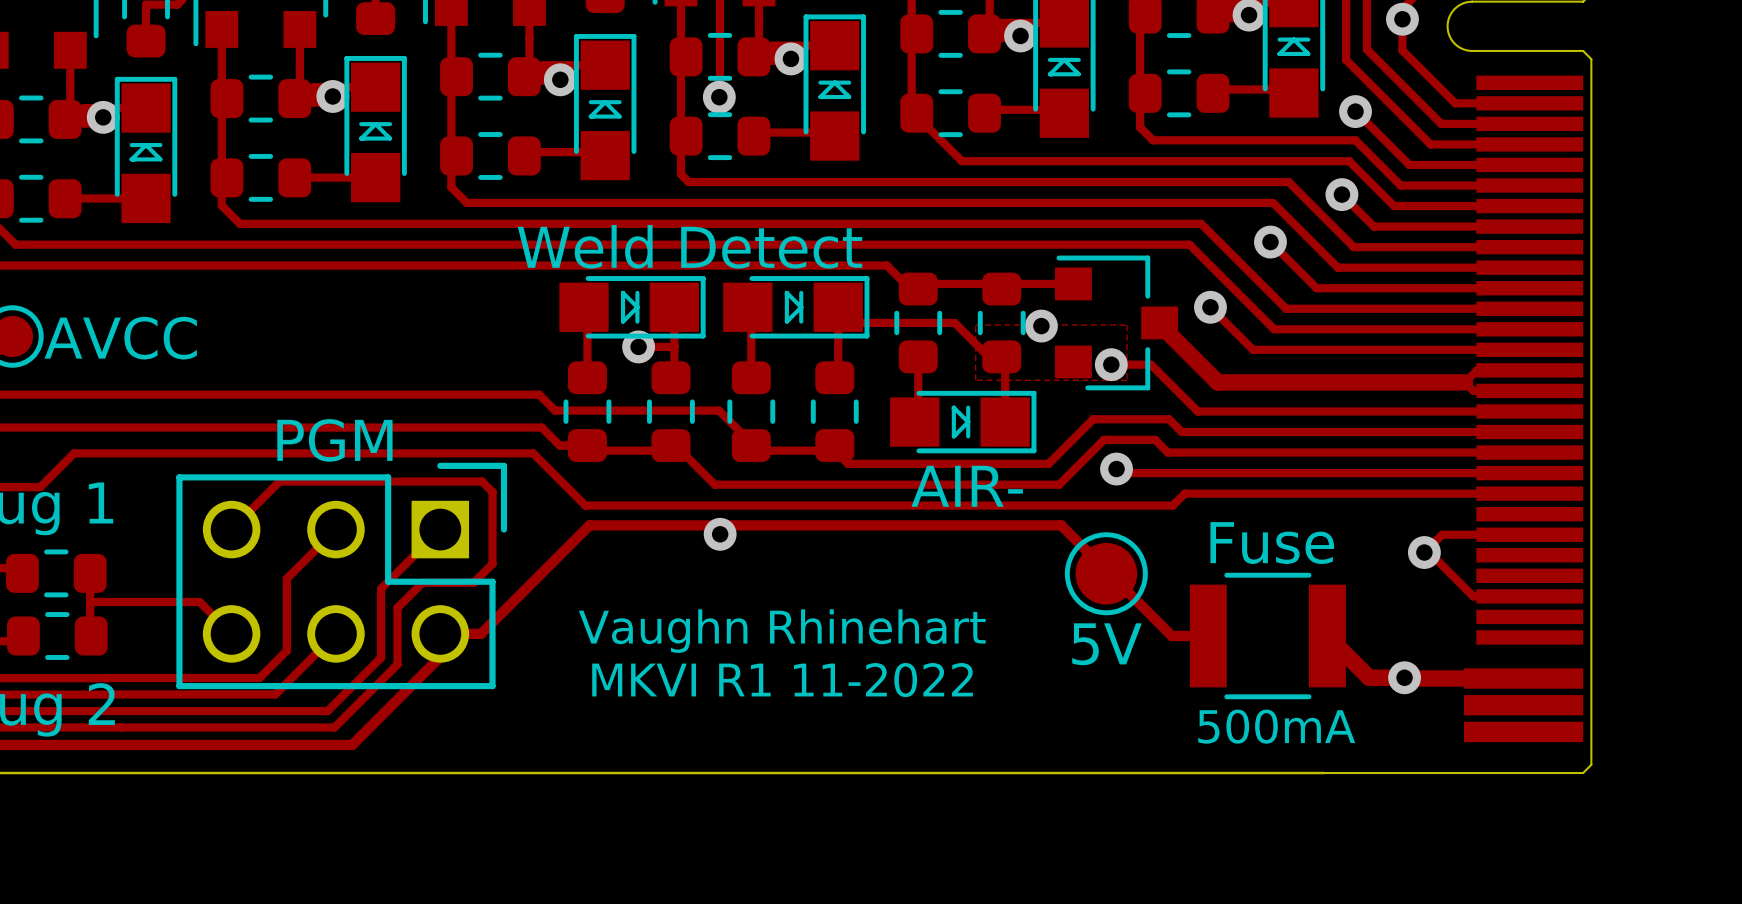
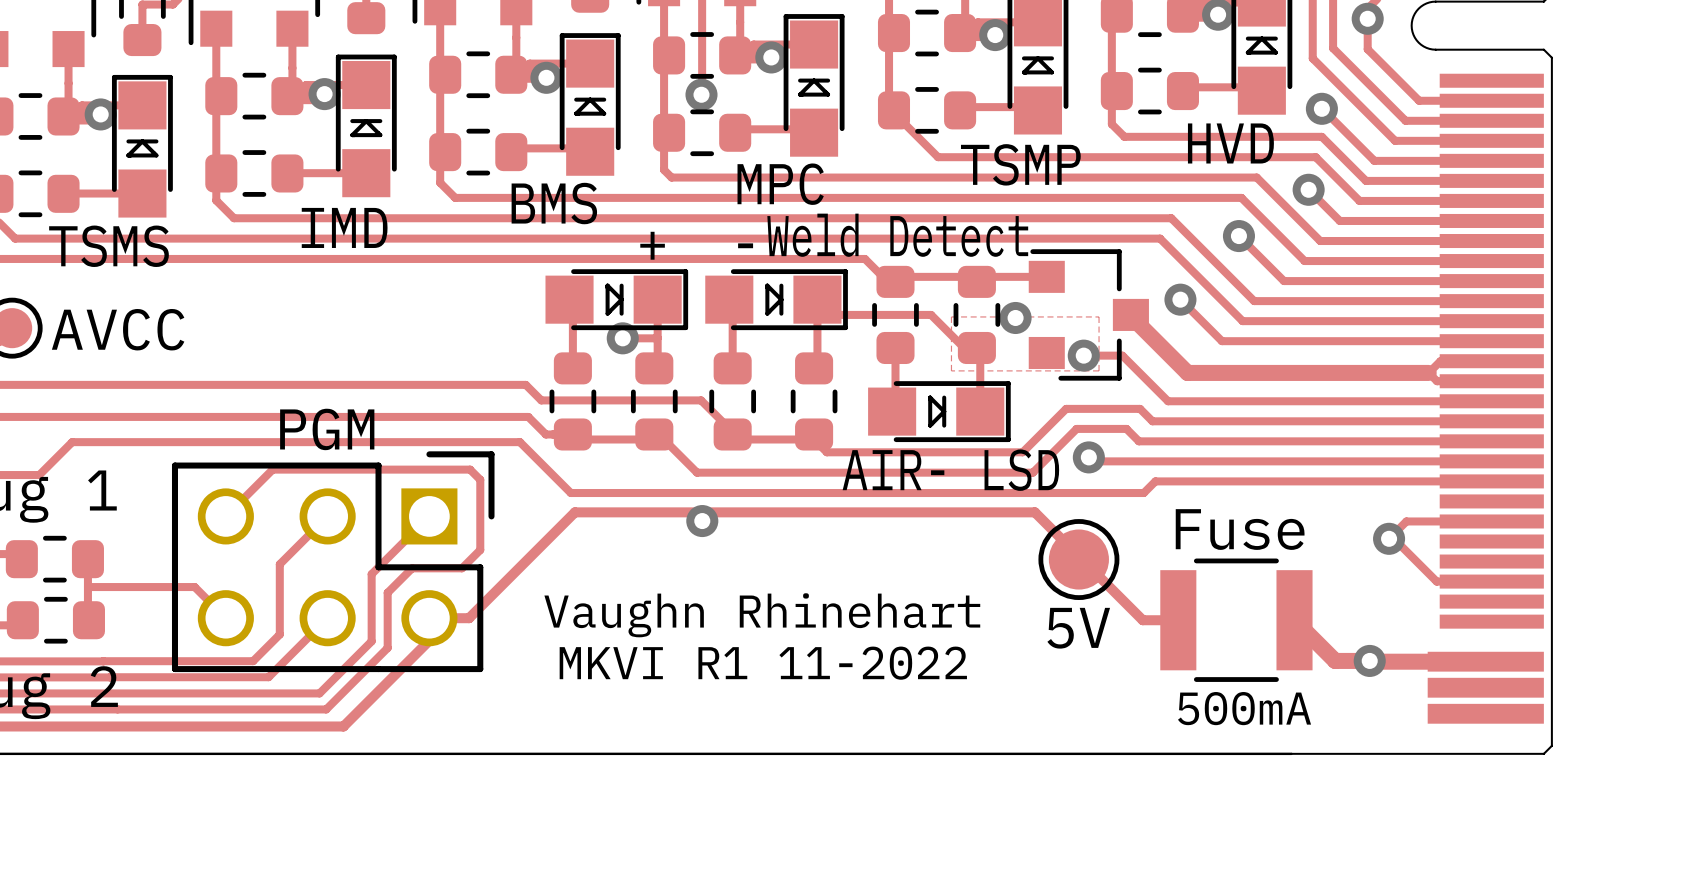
text: none -> HVD (1230, 143)
text: none -> TSMP (1020, 164)
text: none -> MPC (780, 184)
text: none -> BMS (554, 203)
text: none -> IMD (344, 227)
text: none -> Weld Detect (897, 235)
text: Weld Detect (689, 246) -> + - (696, 245)
text: none -> TSMS (109, 246)
text: AIR- (967, 486) -> AIR- LSD (950, 470)

